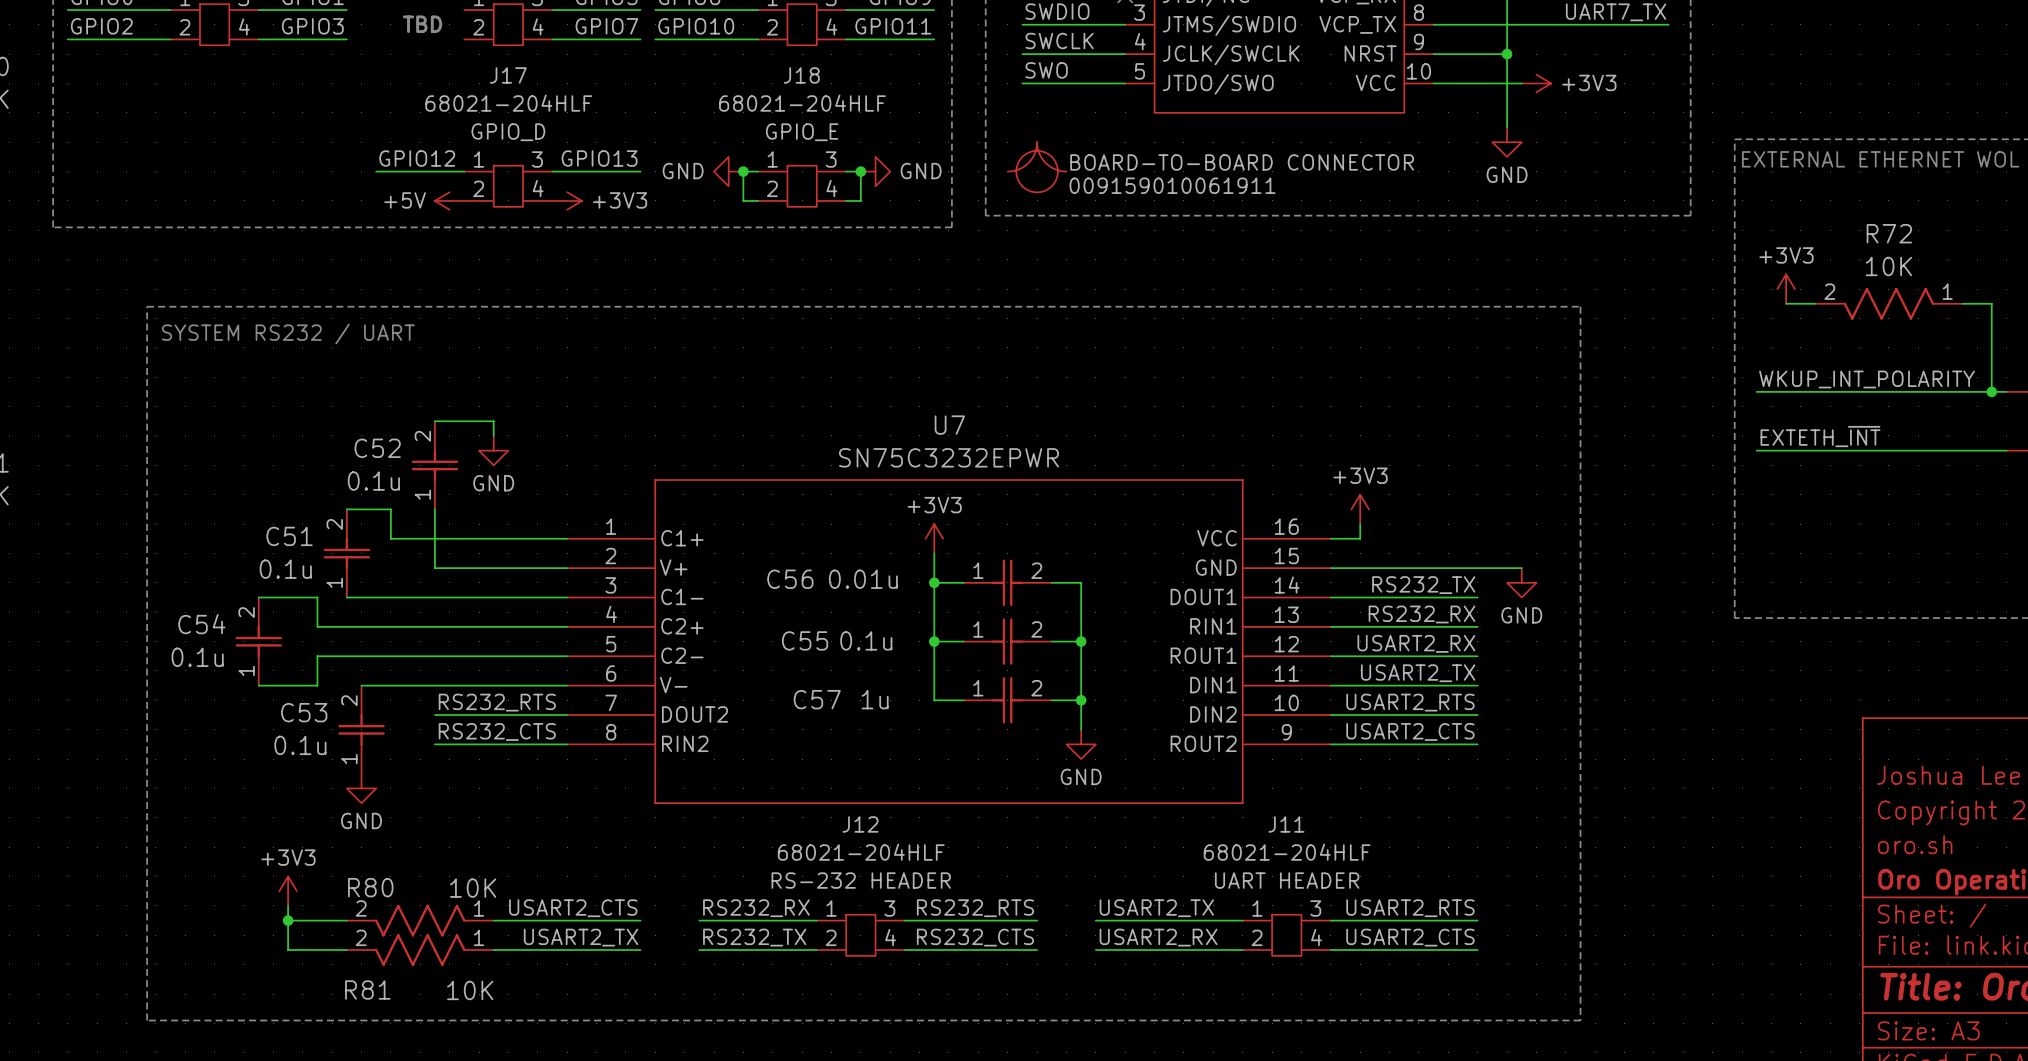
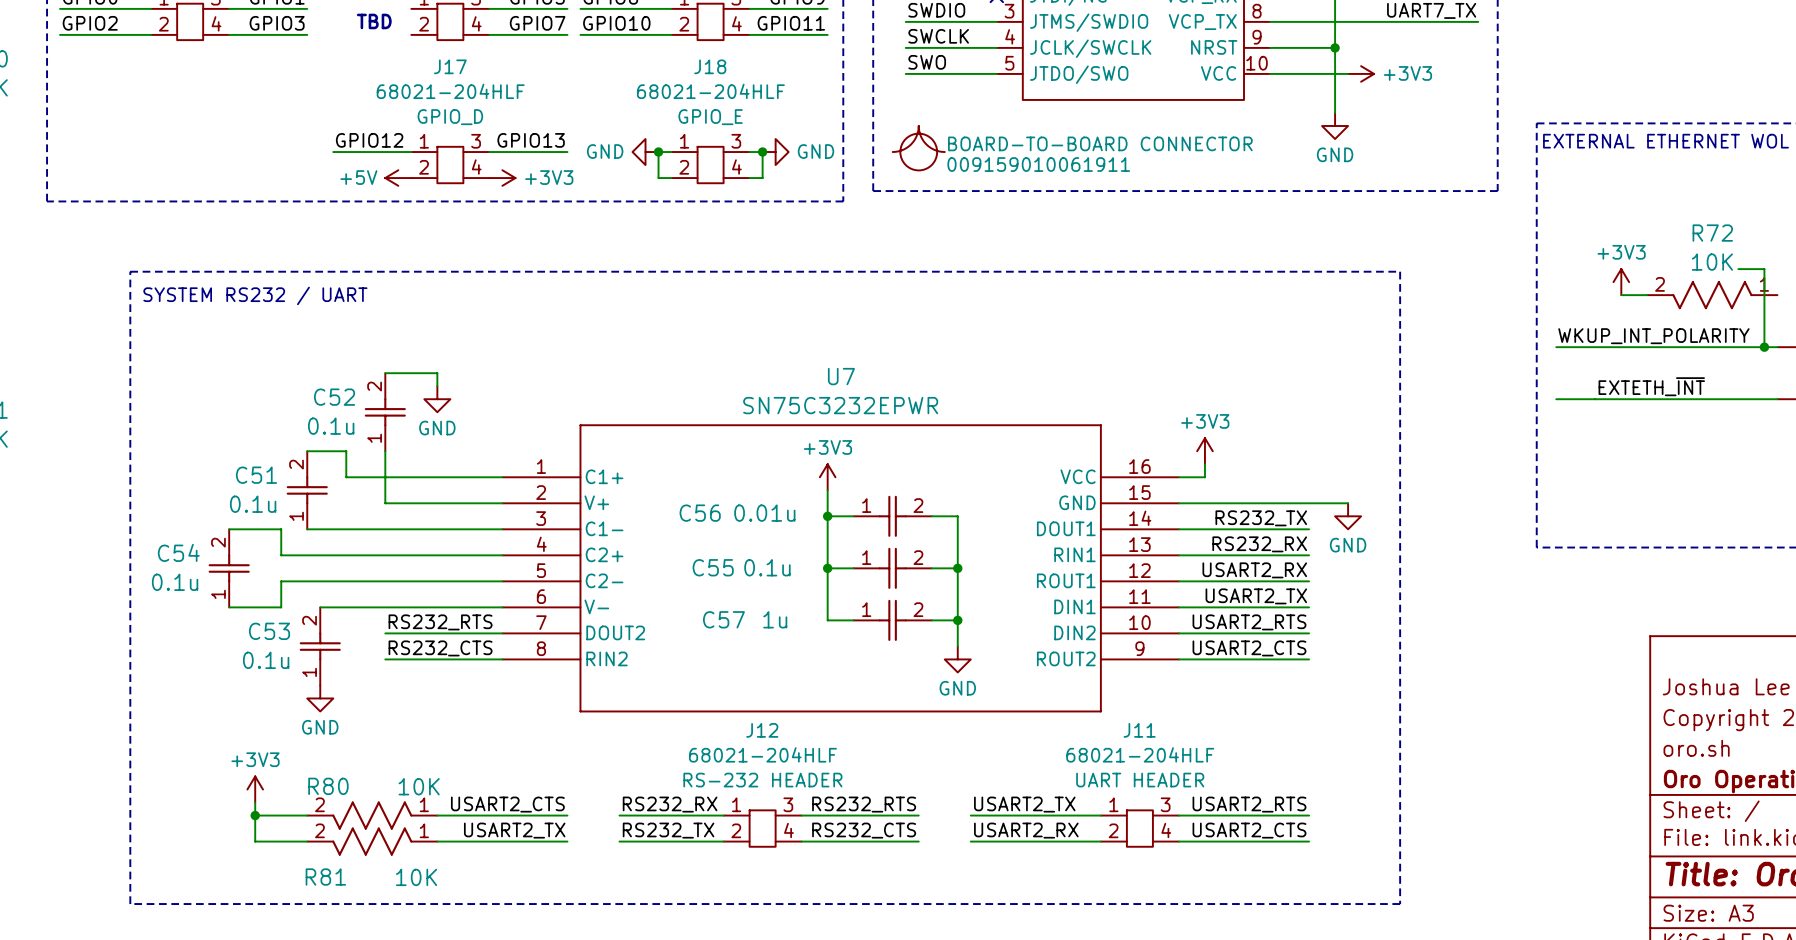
power symbol position: +3V3 (1786, 289) -> +3V3 (1621, 282)
wire: (1786, 303) (1815, 303) -> (1621, 295) (1647, 295)
R72 position: (1888, 303) -> (1712, 295)
label position: EXTETH_~{INT} (1820, 436) -> EXTETH_~{INT} (1651, 386)

